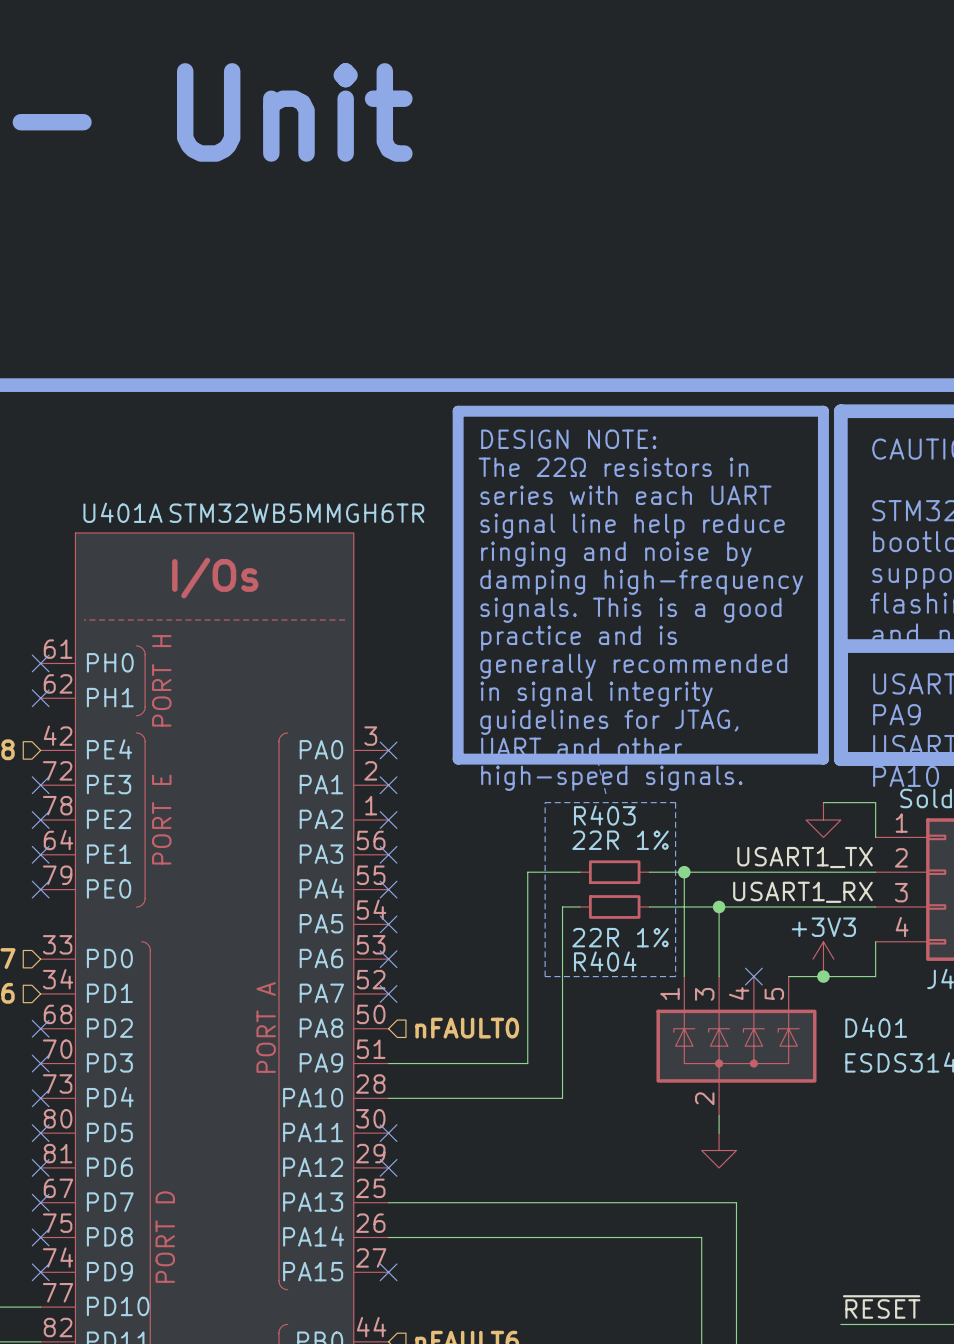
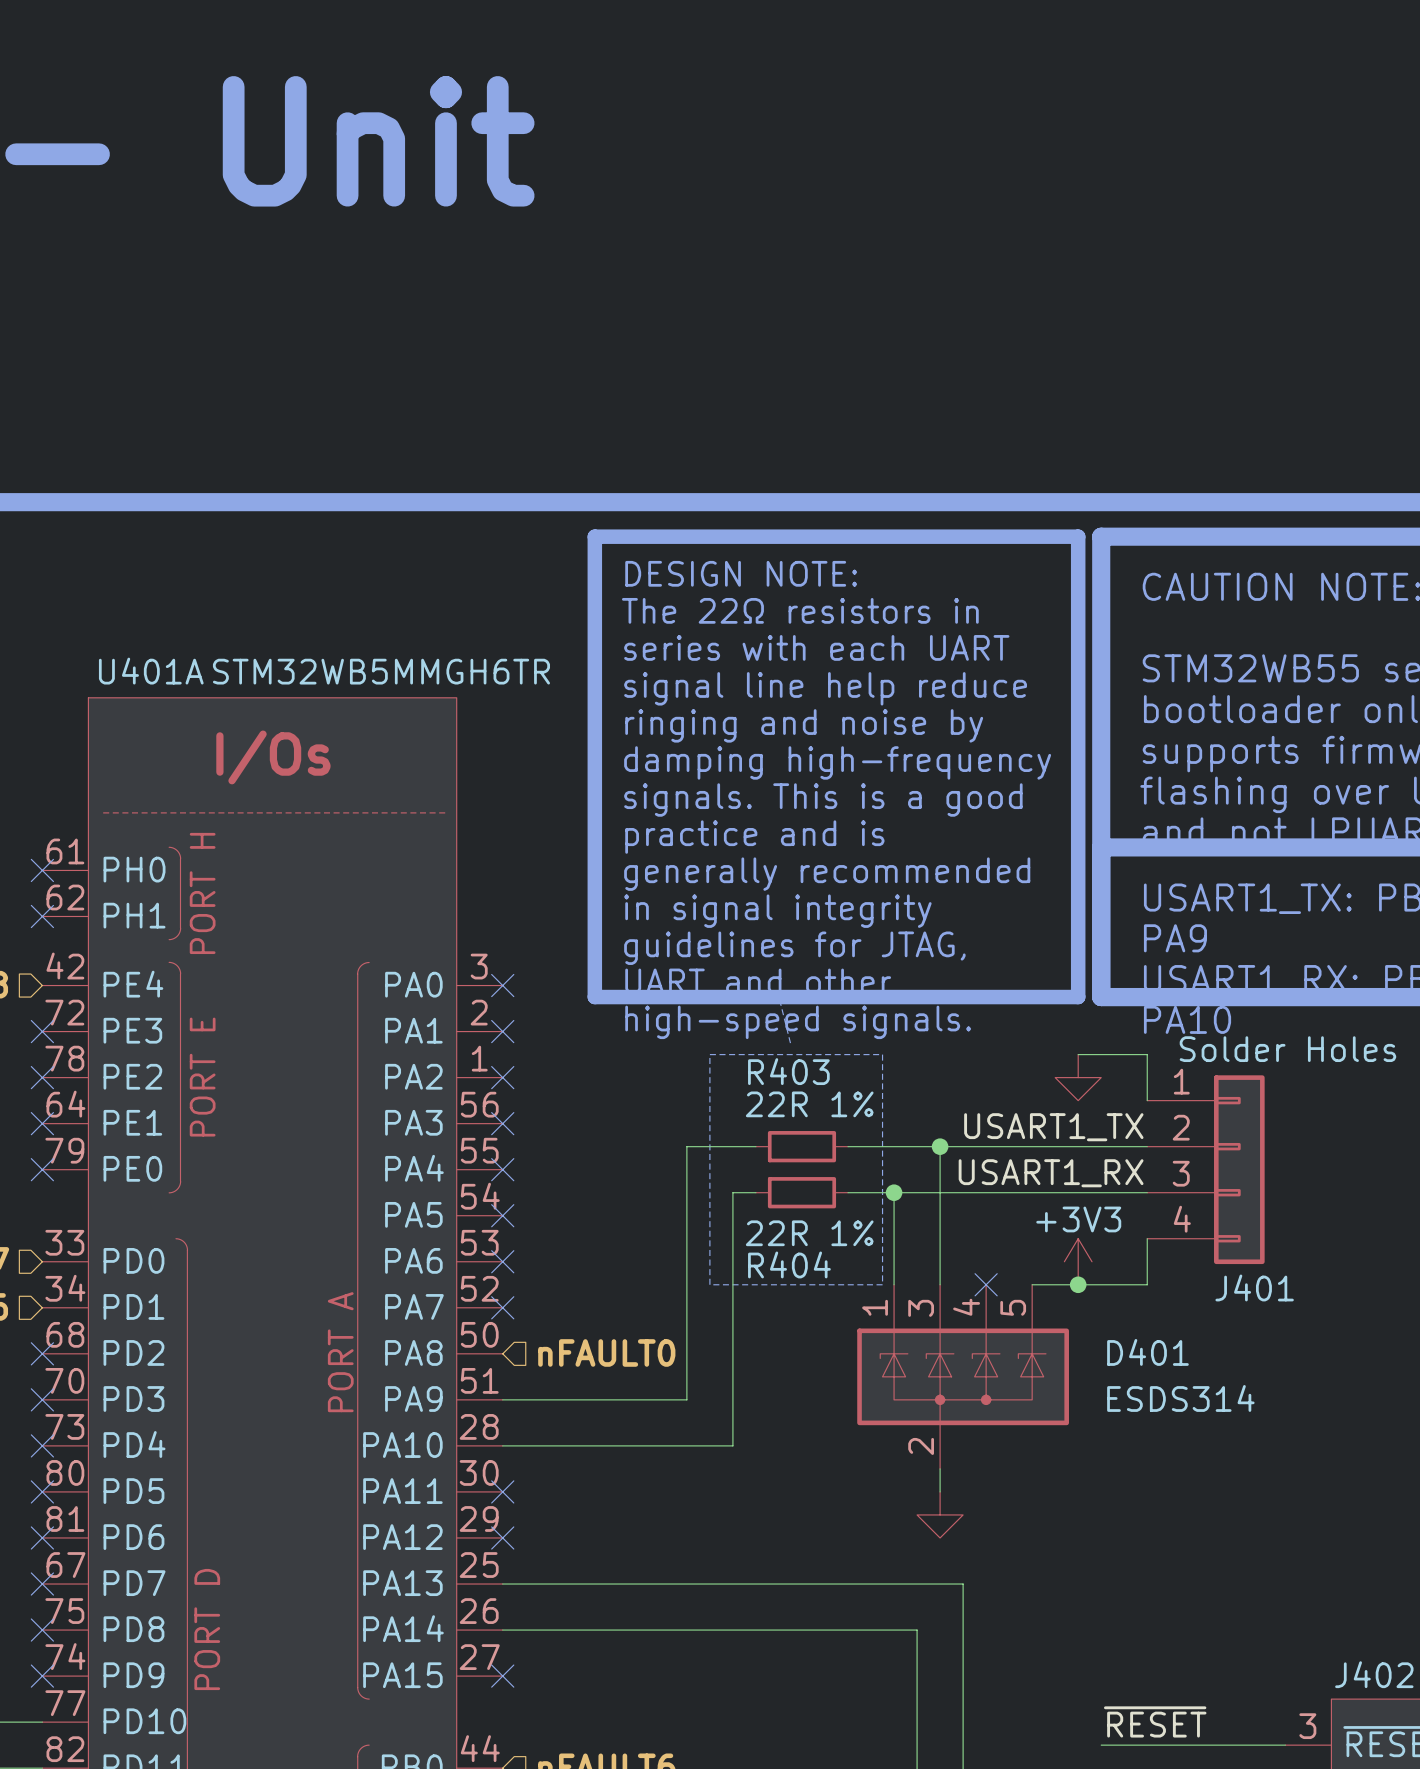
wire: (684, 872) (684, 906) -> (940, 1146) (940, 1192)
junction: (684, 872) -> none
junction: none -> (940, 1146)
junction: none -> (894, 1192)
junction: (719, 906) -> none

